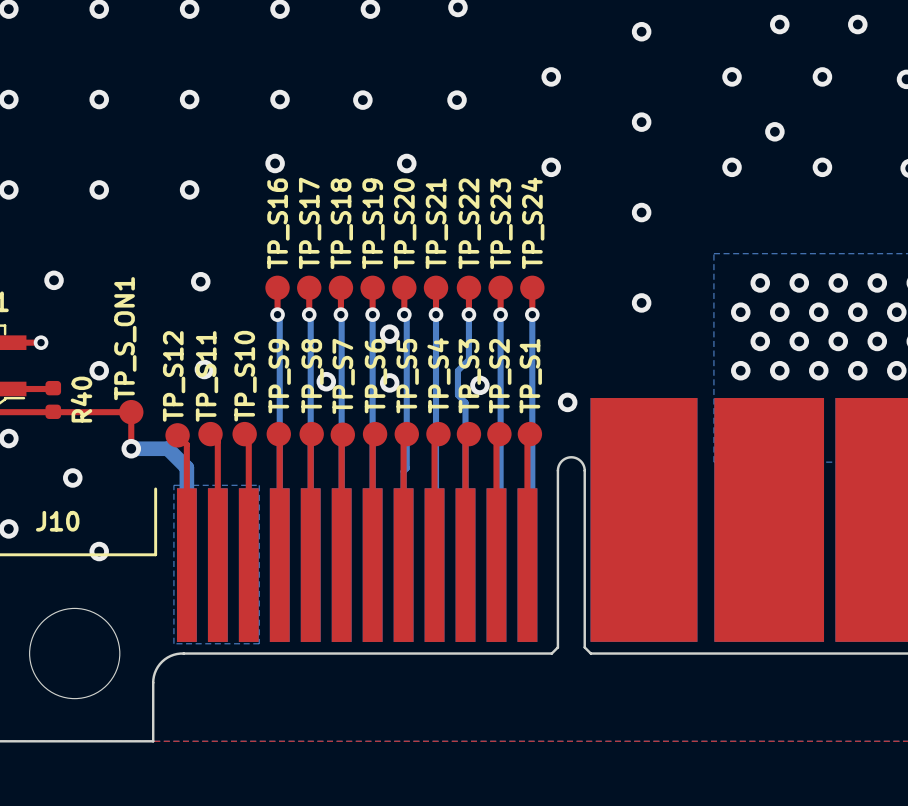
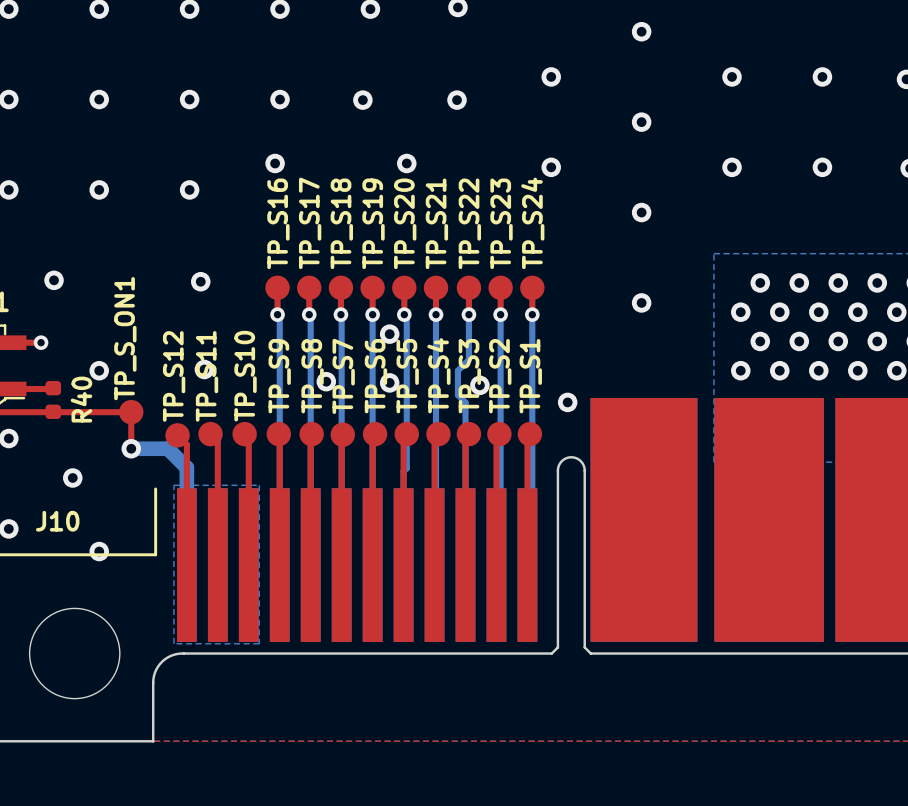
via: (779, 24) -> none
via: (857, 24) -> none
via: (774, 131) -> none

